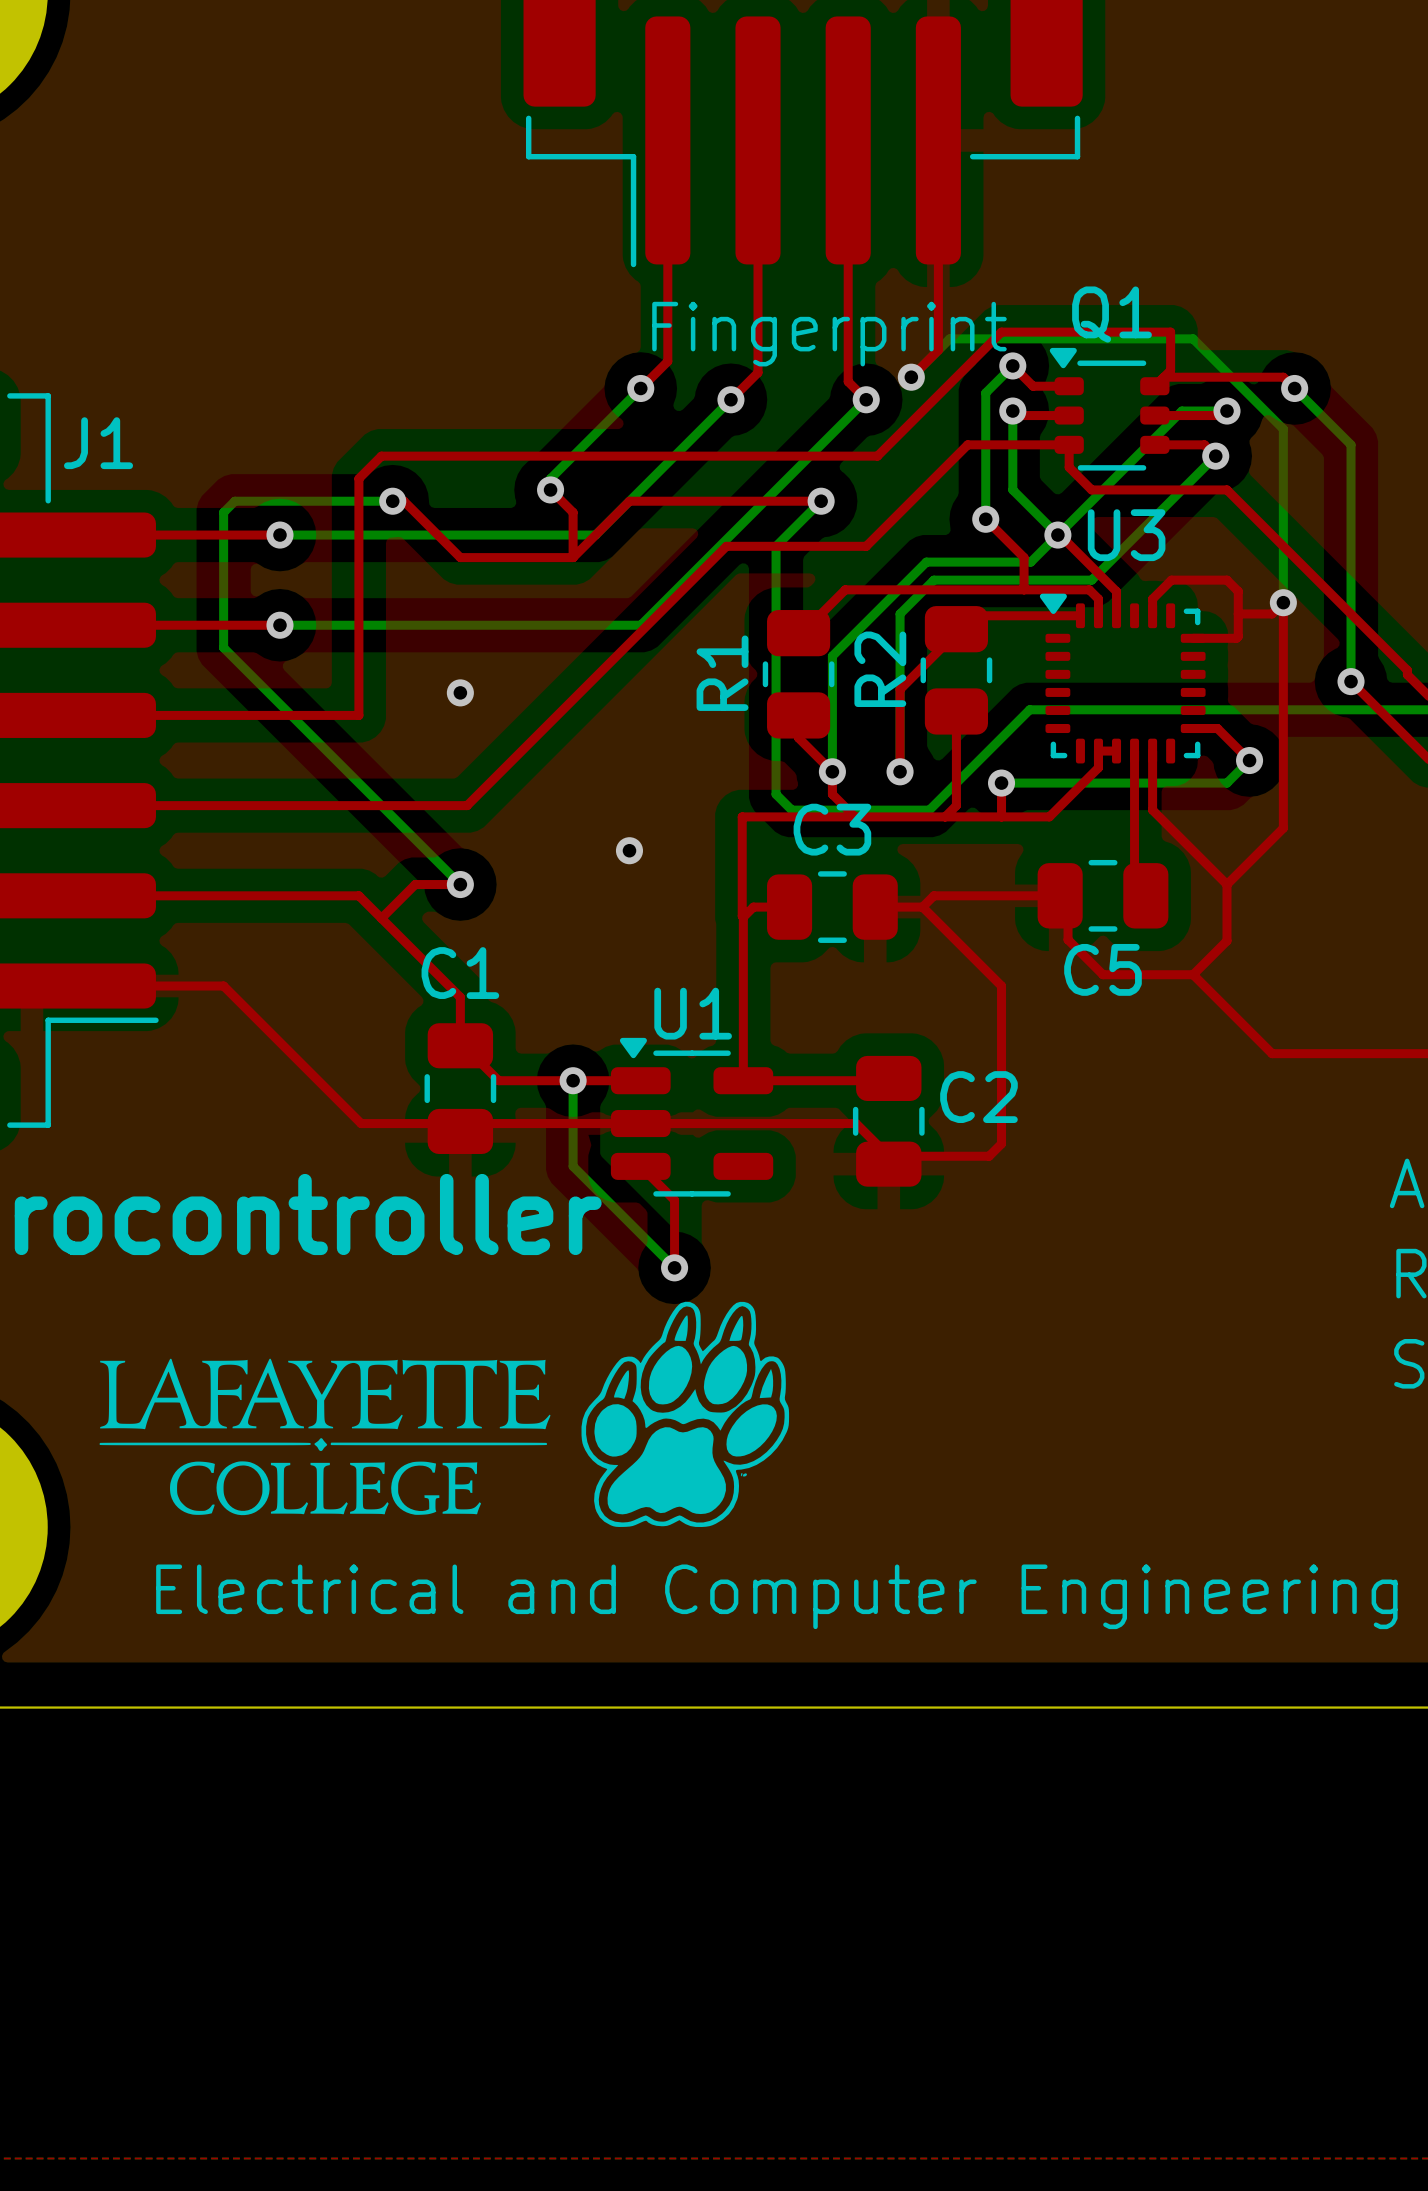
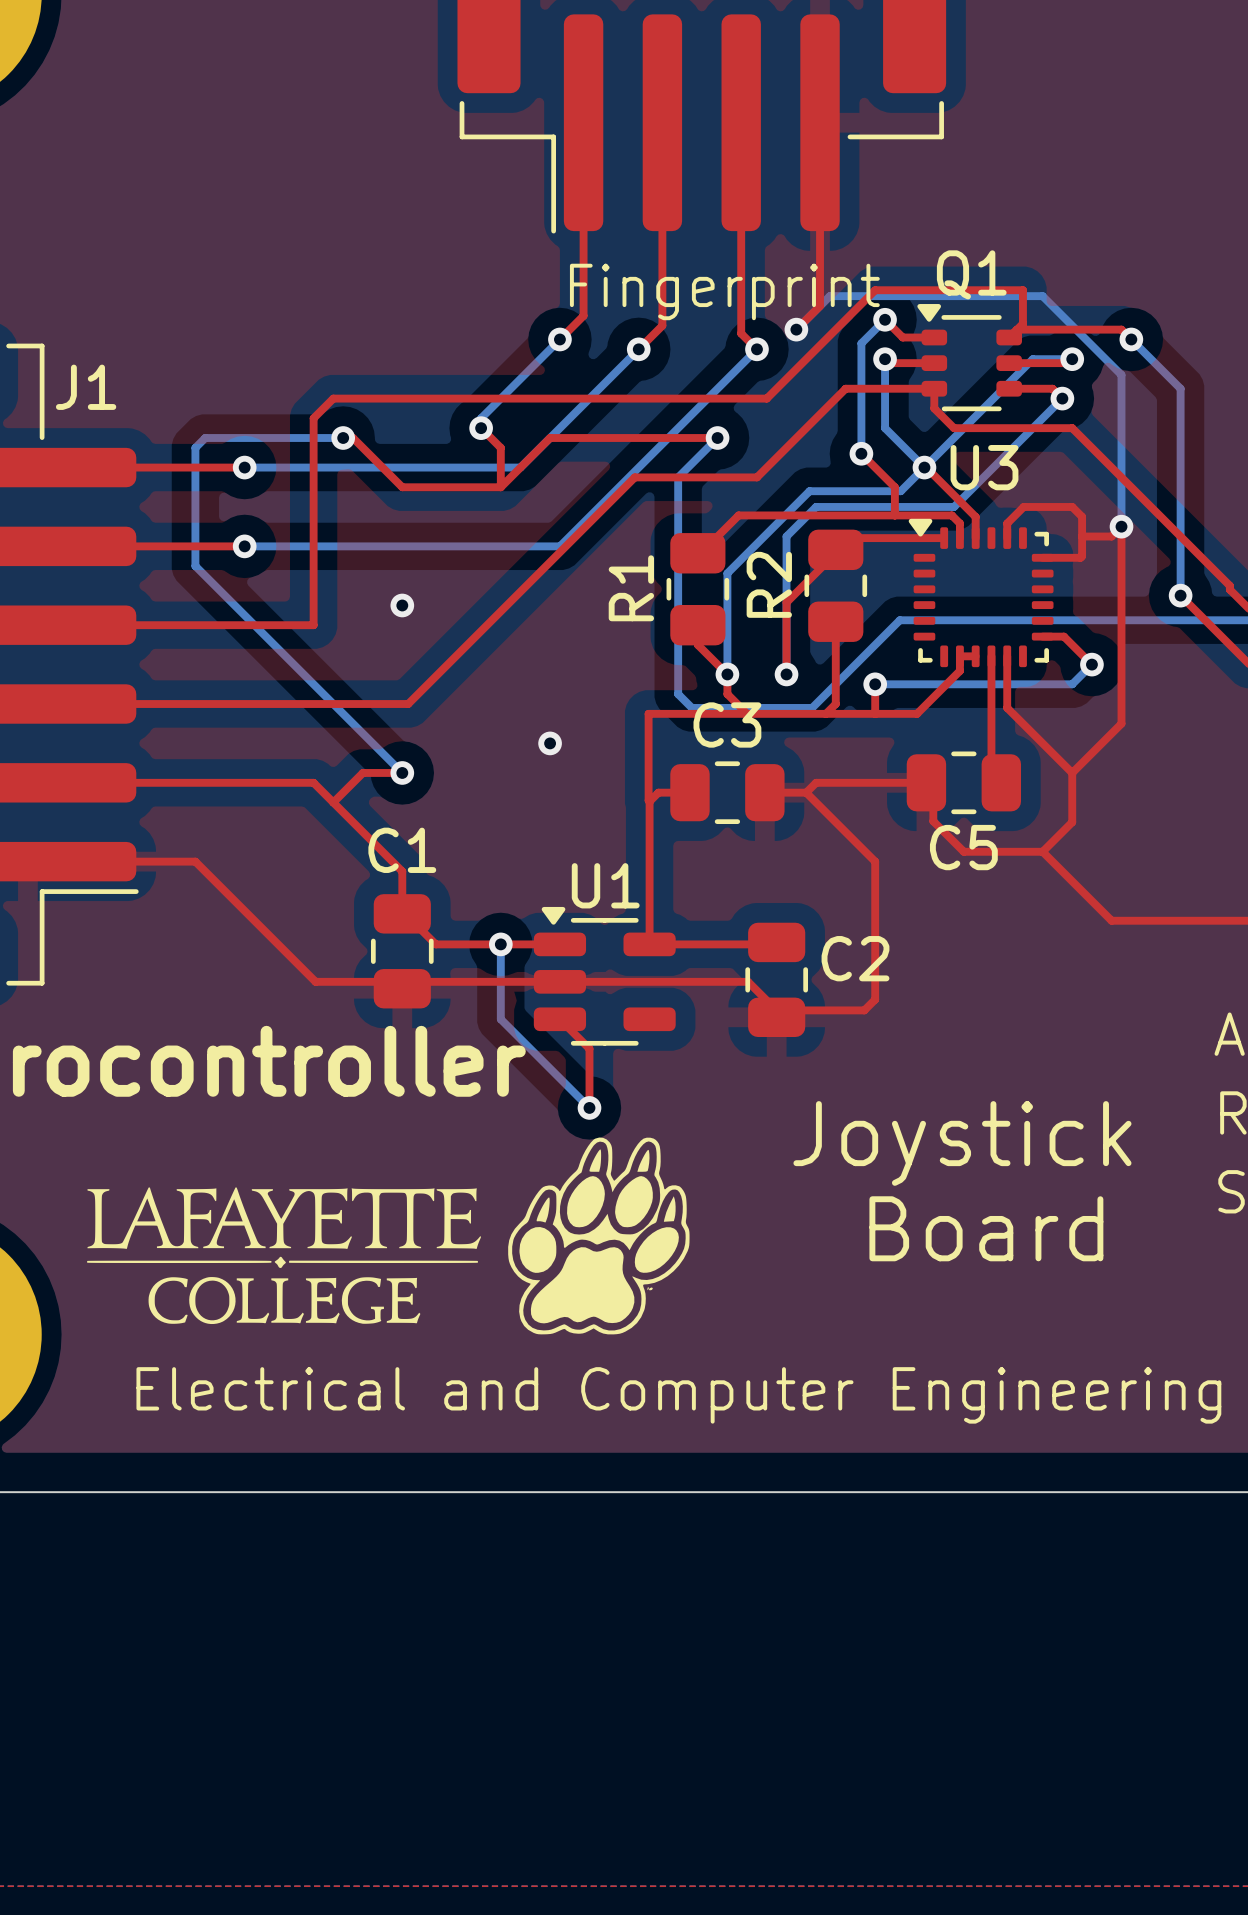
text: none -> Joystick (962, 1143)
text: none -> Board (986, 1228)

